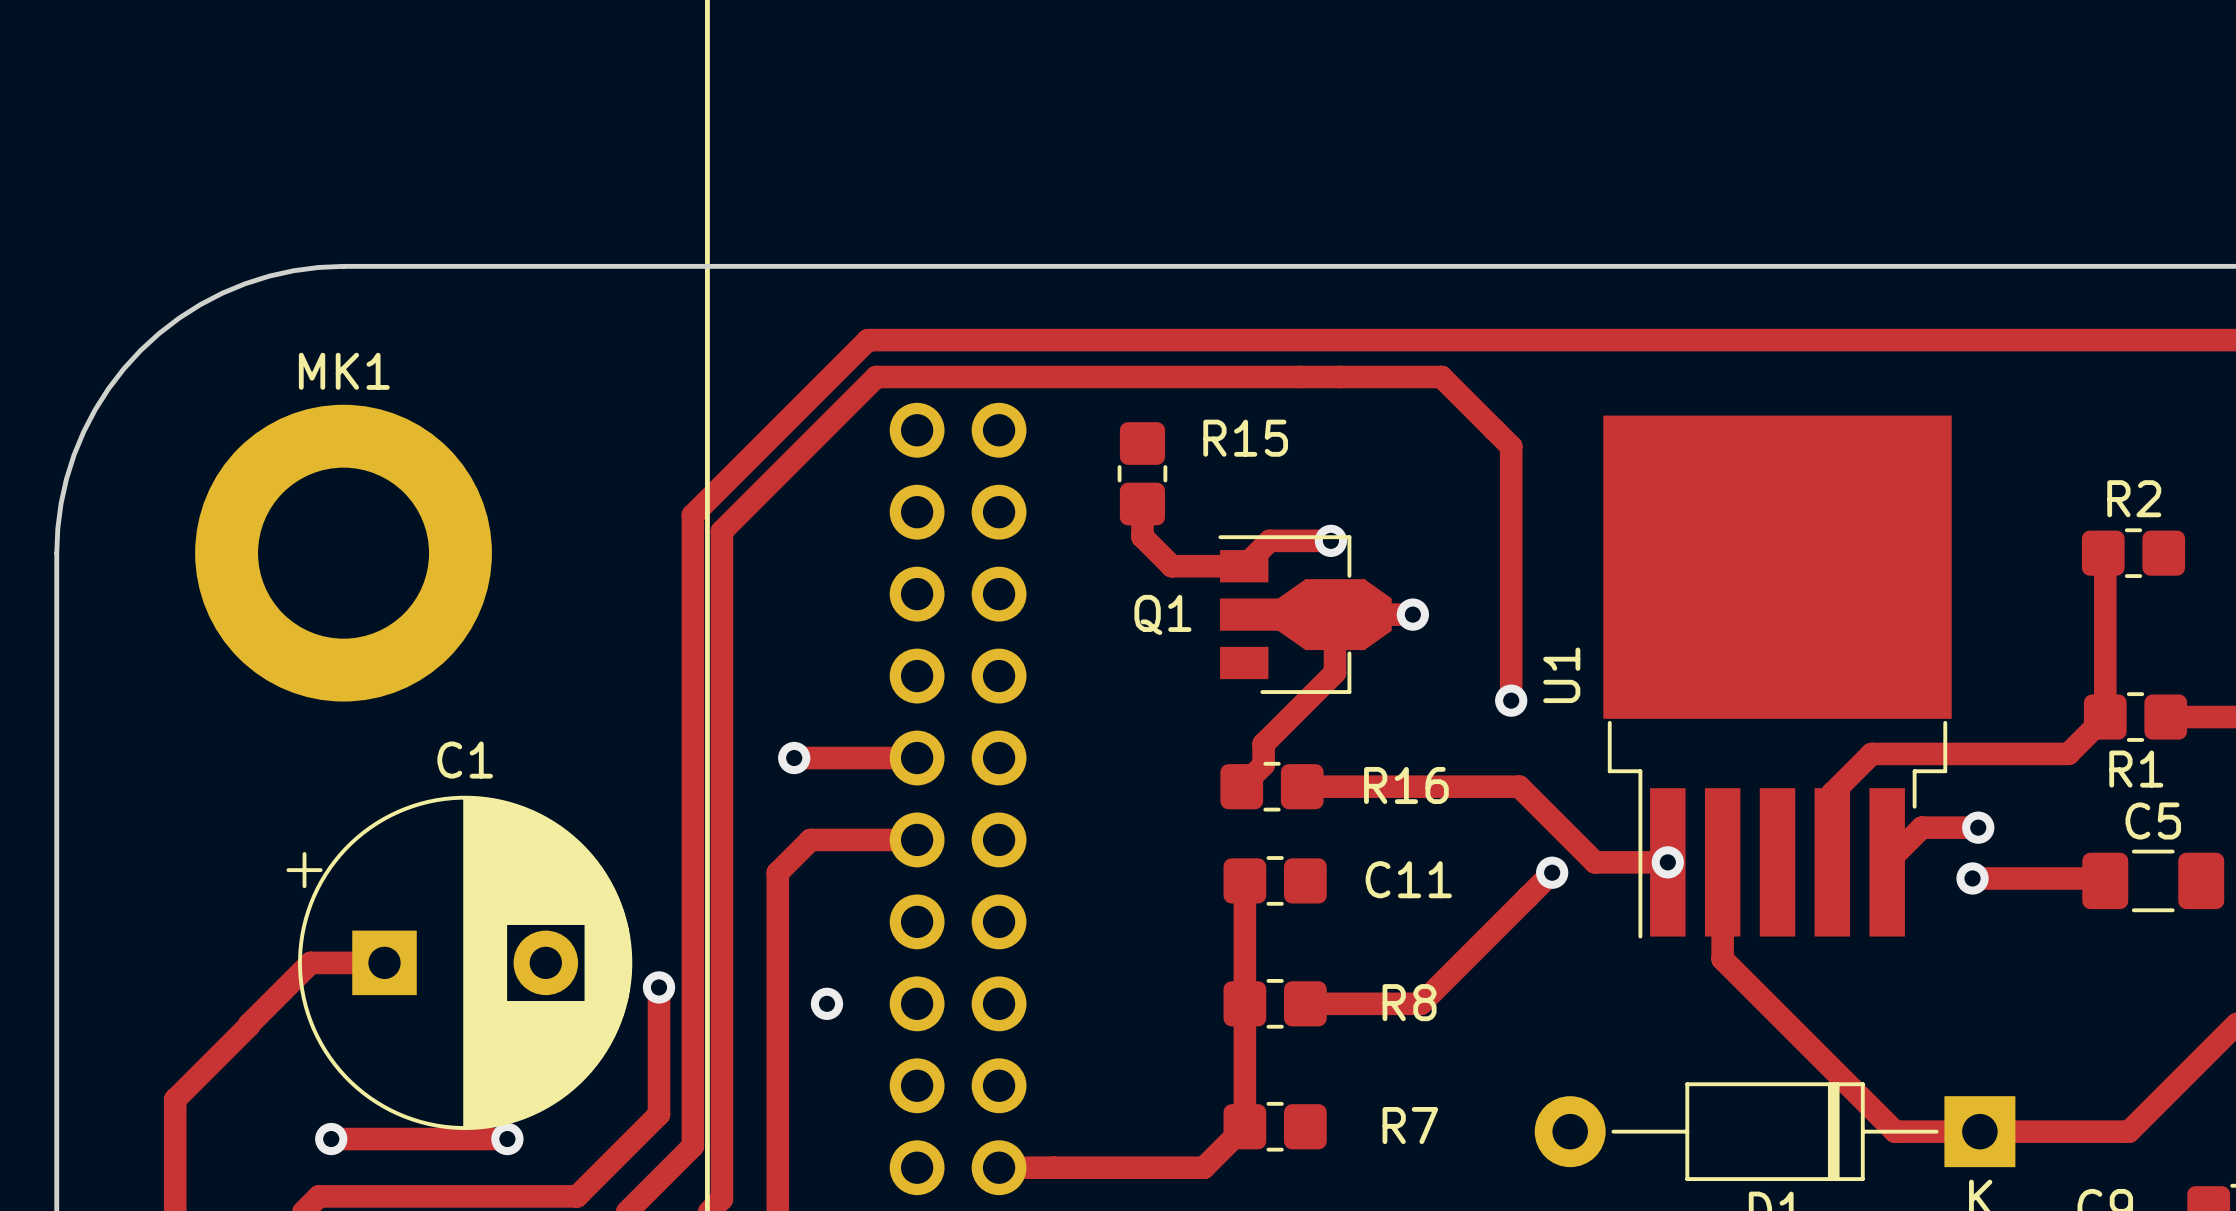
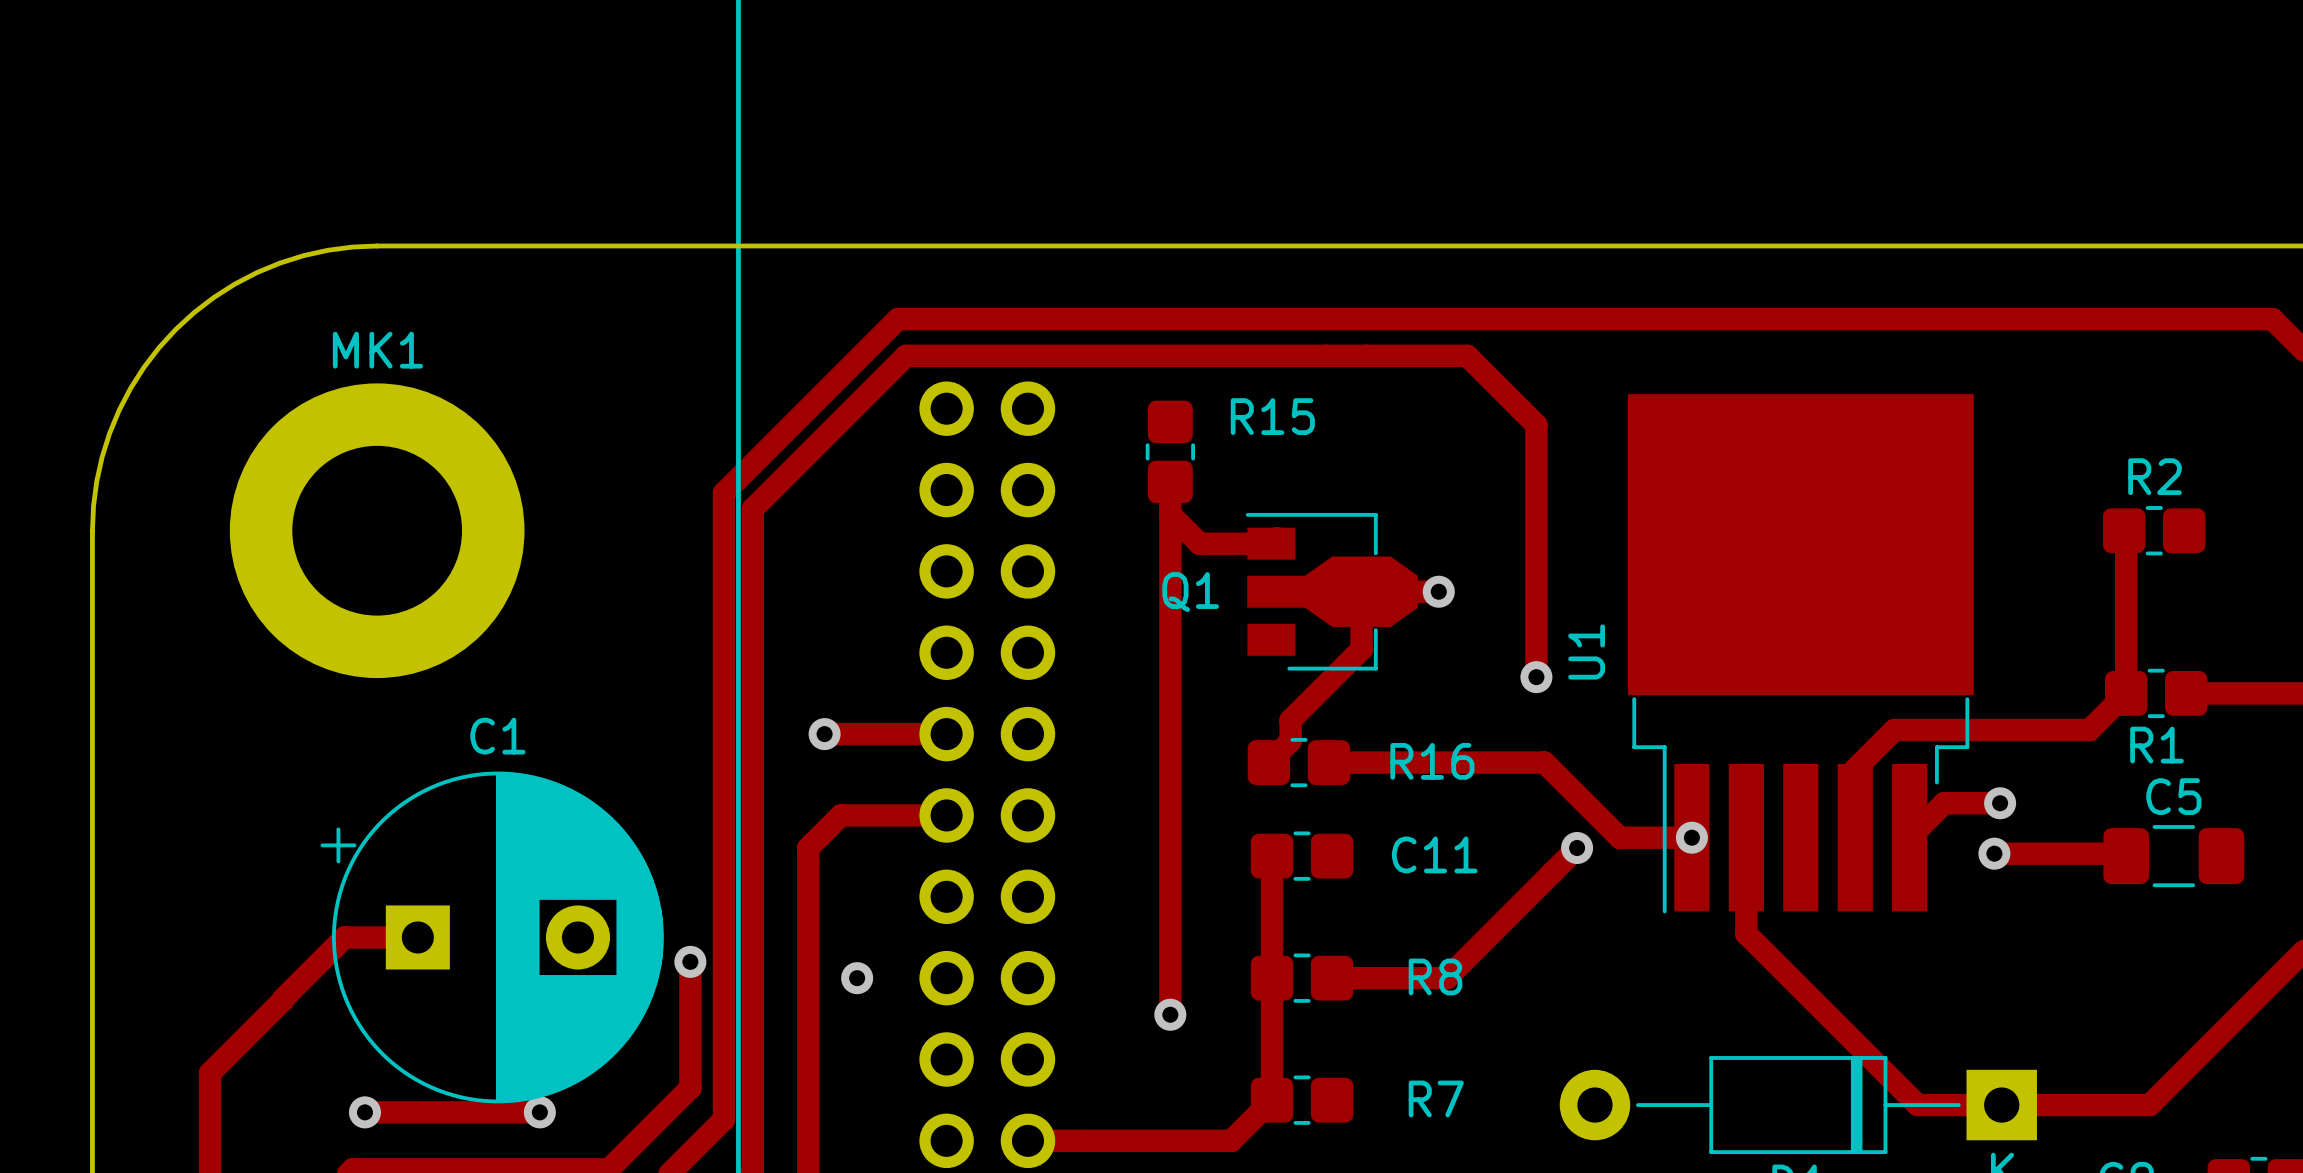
track: none -> (1170, 514) (1170, 1014)
track: (1330, 540) (1269, 540) (1249, 560) -> none
via: (1330, 540) -> none
via: none -> (1170, 1014)

